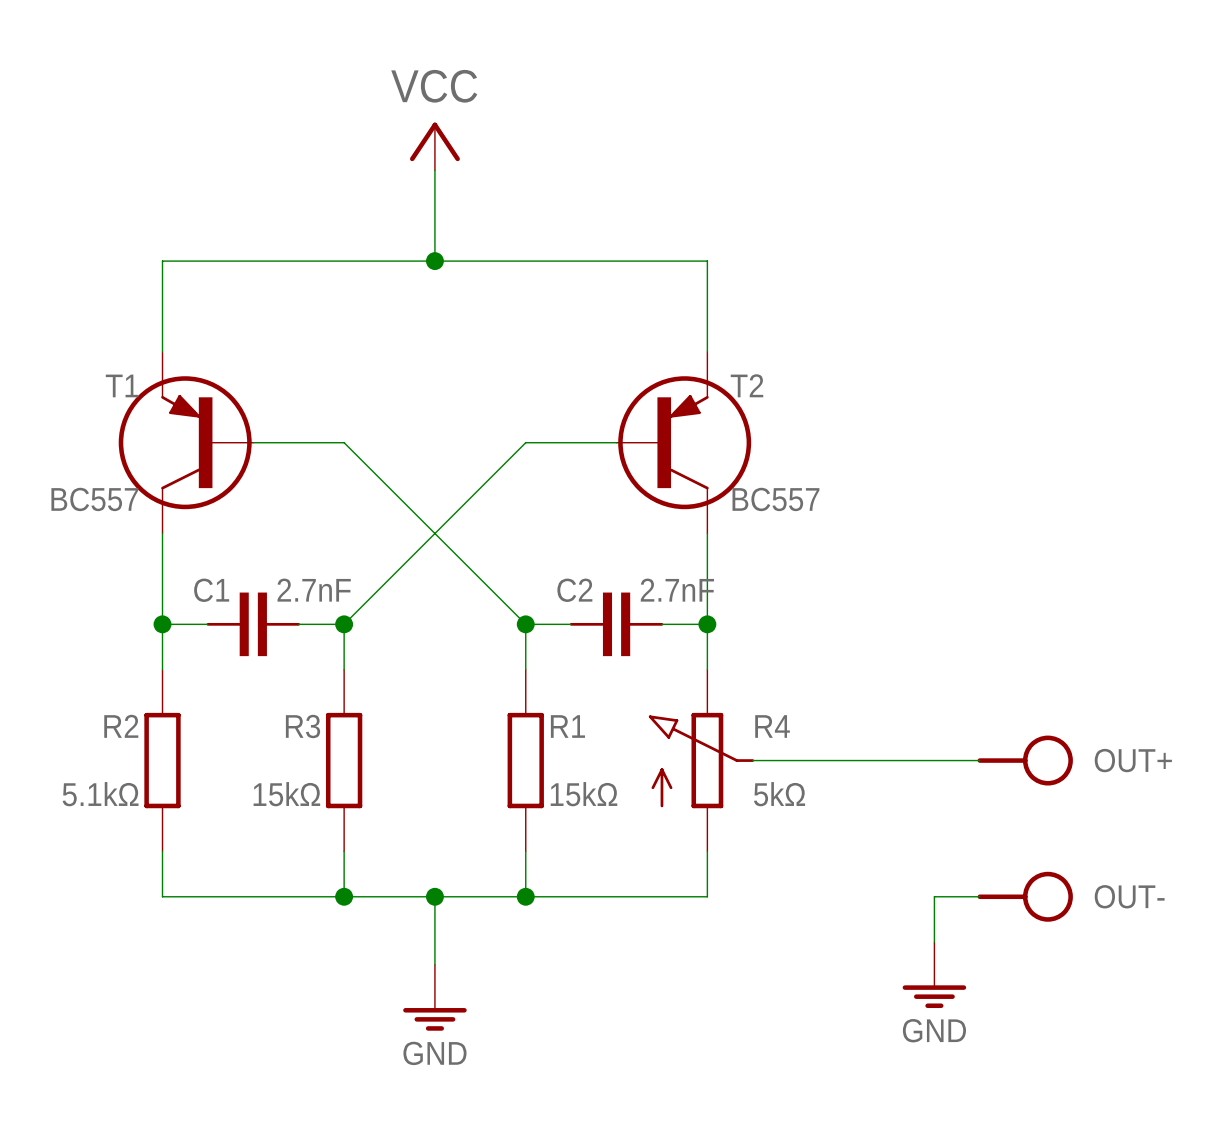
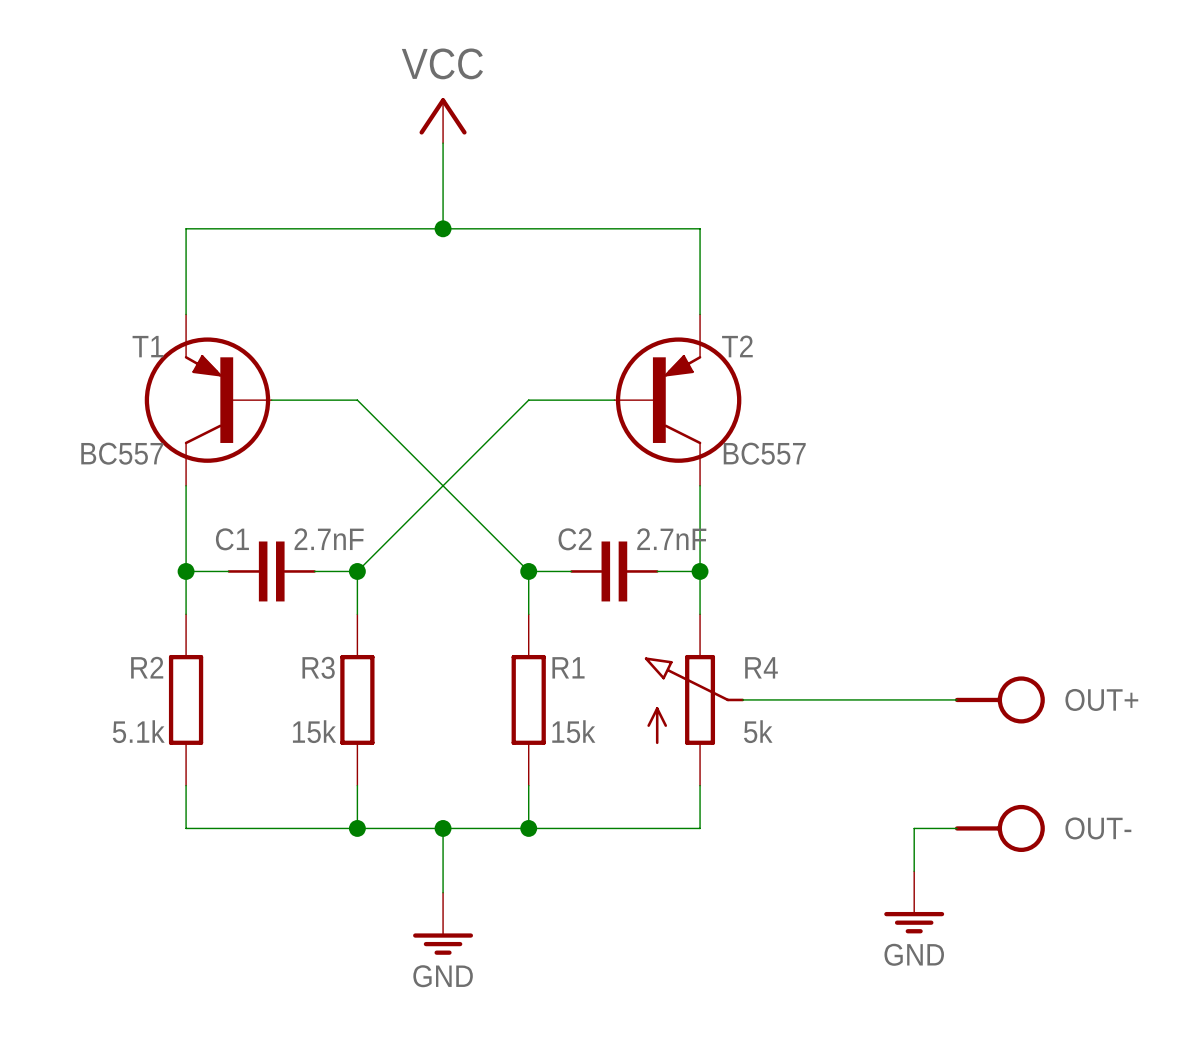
R2 value: 5.1kΩ (100, 794) -> 5.1k (138, 731)
R3 value: 15kΩ (286, 794) -> 15k (314, 731)
R1 value: 15kΩ (583, 794) -> 15k (573, 731)
R4 value: 5kΩ (779, 794) -> 5k (758, 731)

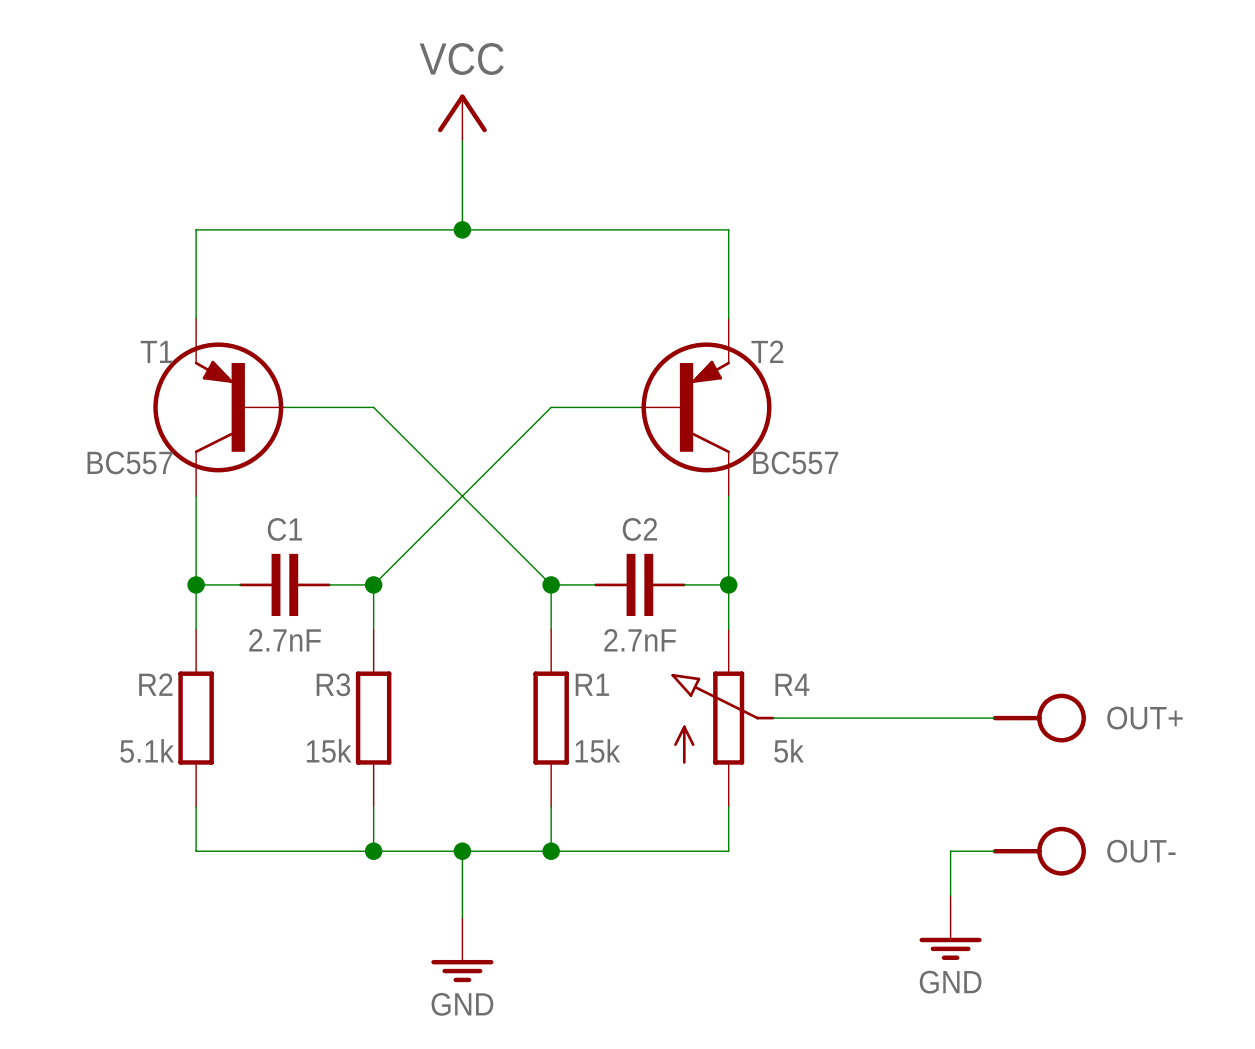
C1 name position: C1 (232, 539) -> C1 (284, 529)
C1 value position: 2.7nF (329, 539) -> 2.7nF (285, 640)
C2 name position: C2 (575, 539) -> C2 (639, 529)
C2 value position: 2.7nF (671, 539) -> 2.7nF (640, 640)

